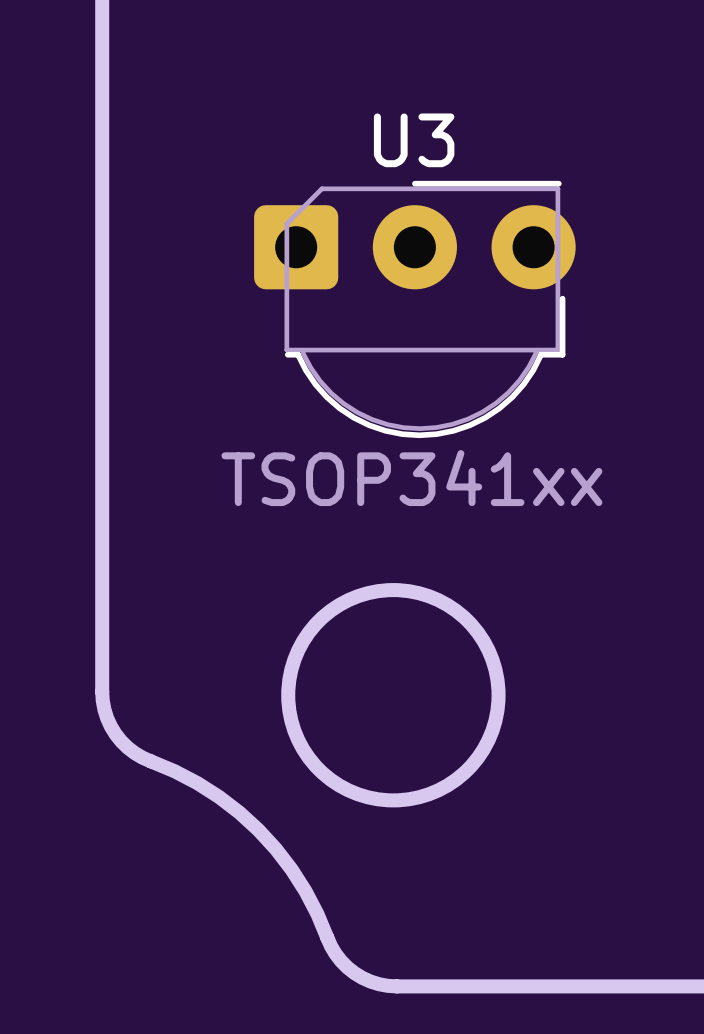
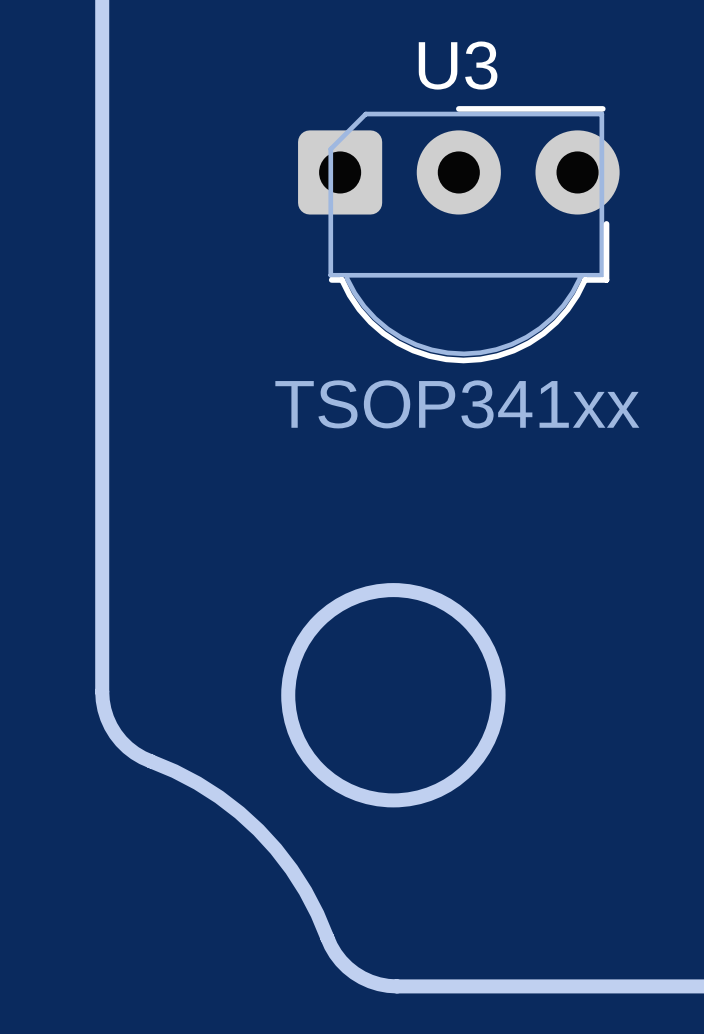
U3 position: (414, 309) -> (458, 234)

